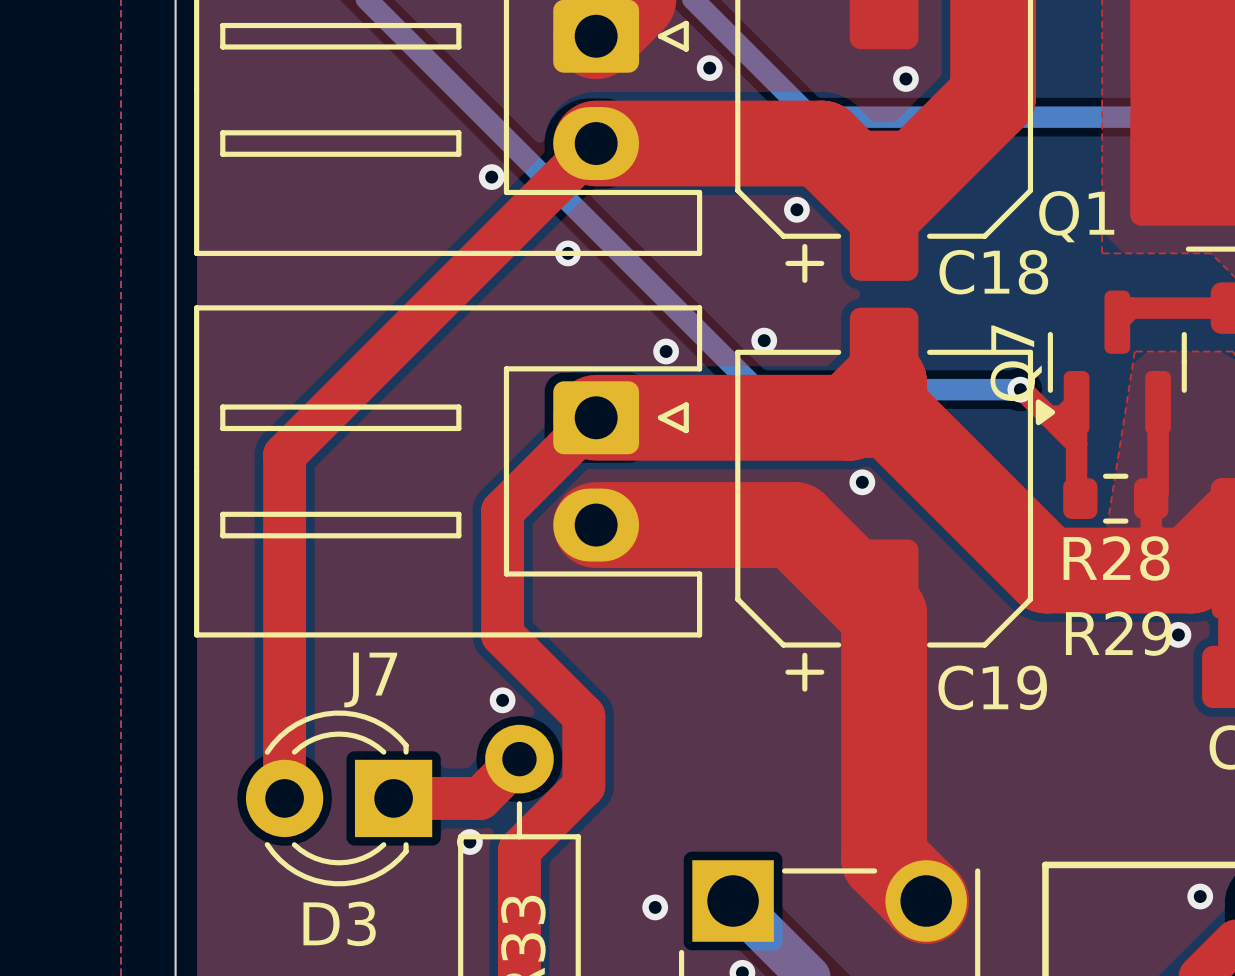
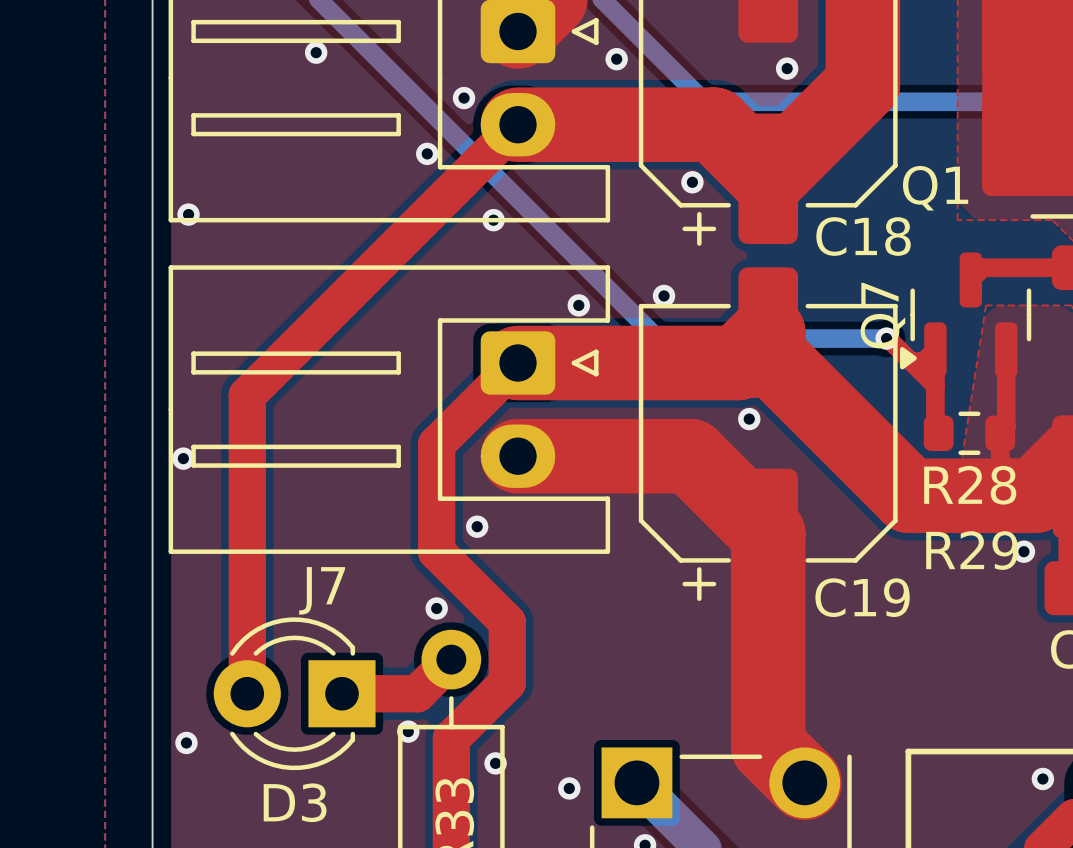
via: none -> (316, 52)
via: none -> (464, 98)
via: none -> (188, 214)
via: none -> (183, 458)
via: none -> (477, 526)
via: none -> (186, 742)
via: none -> (495, 763)

